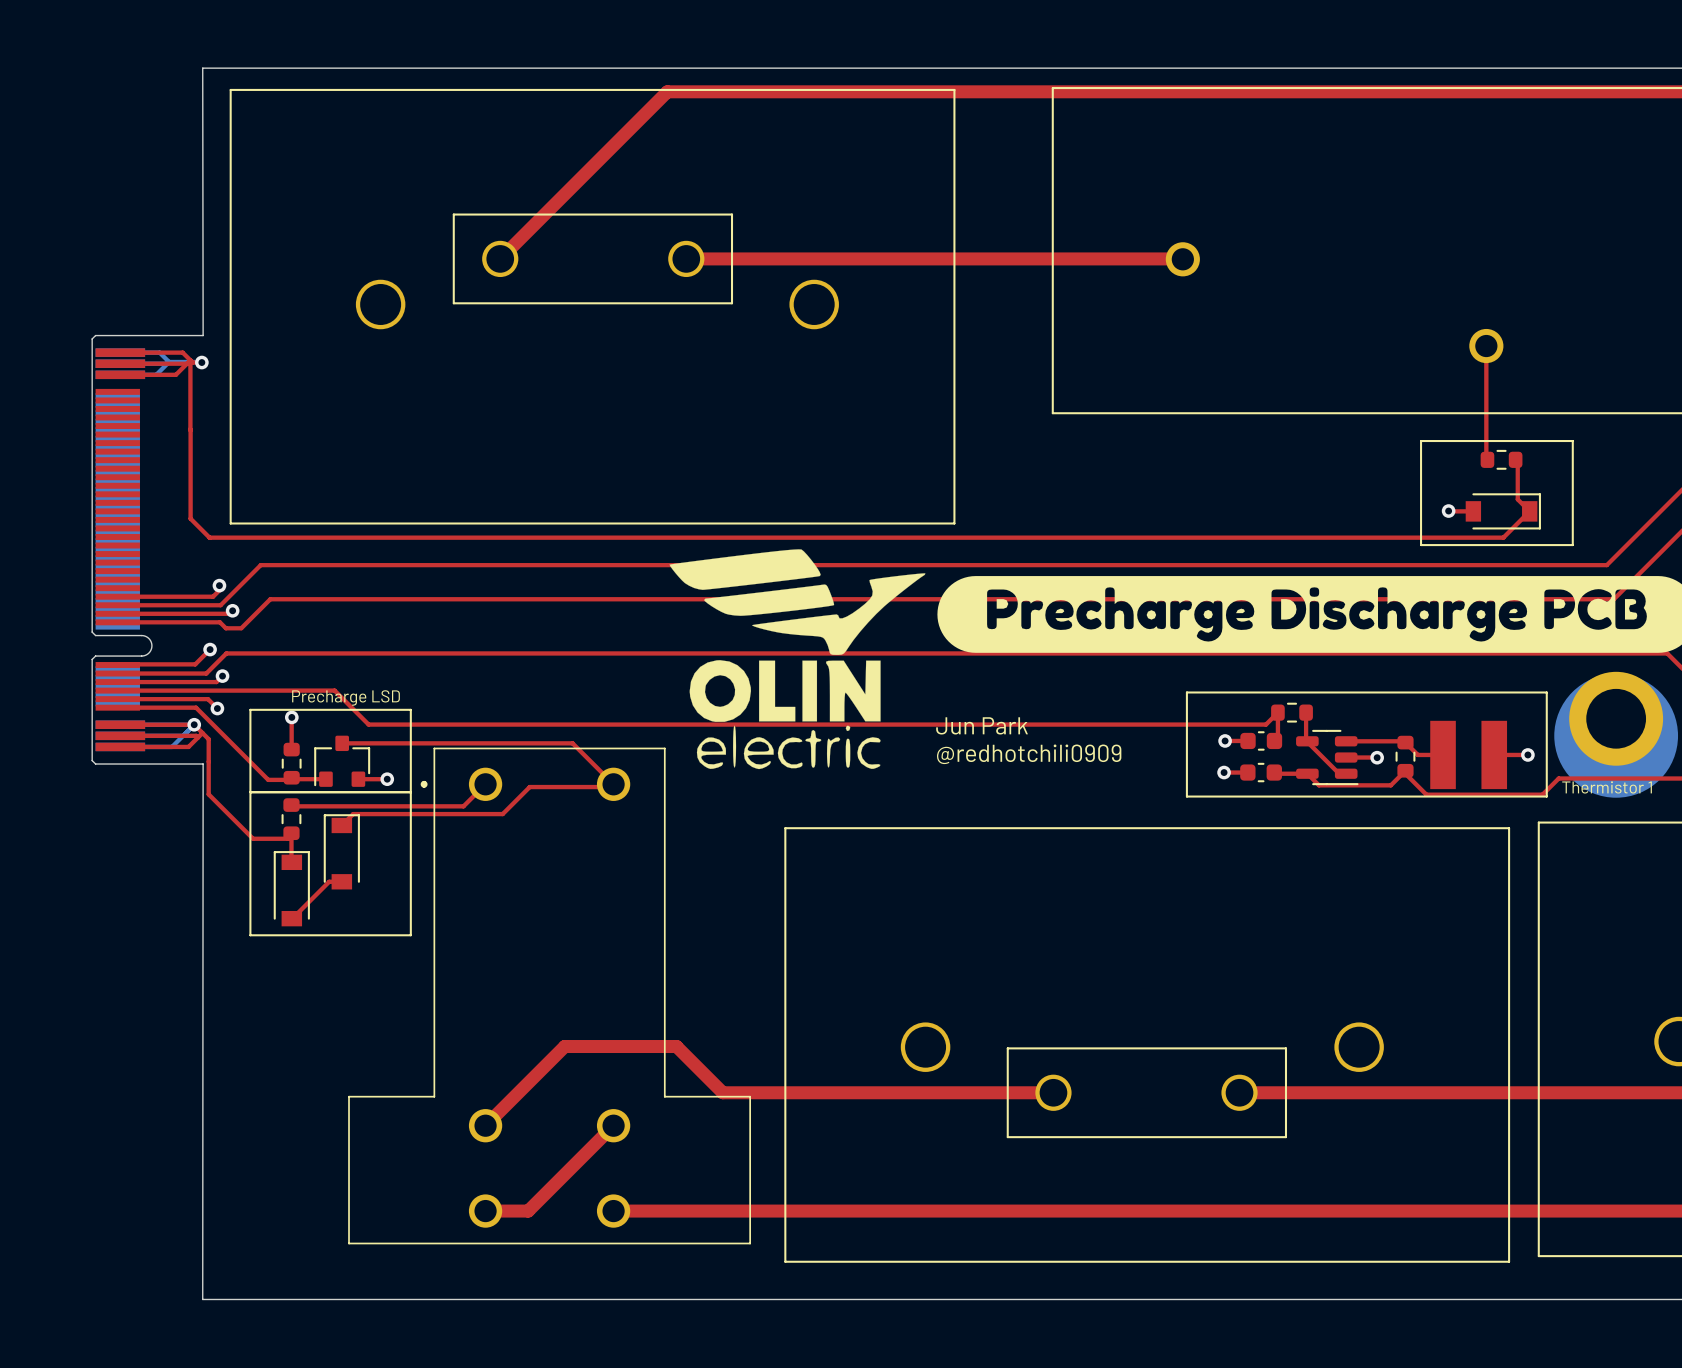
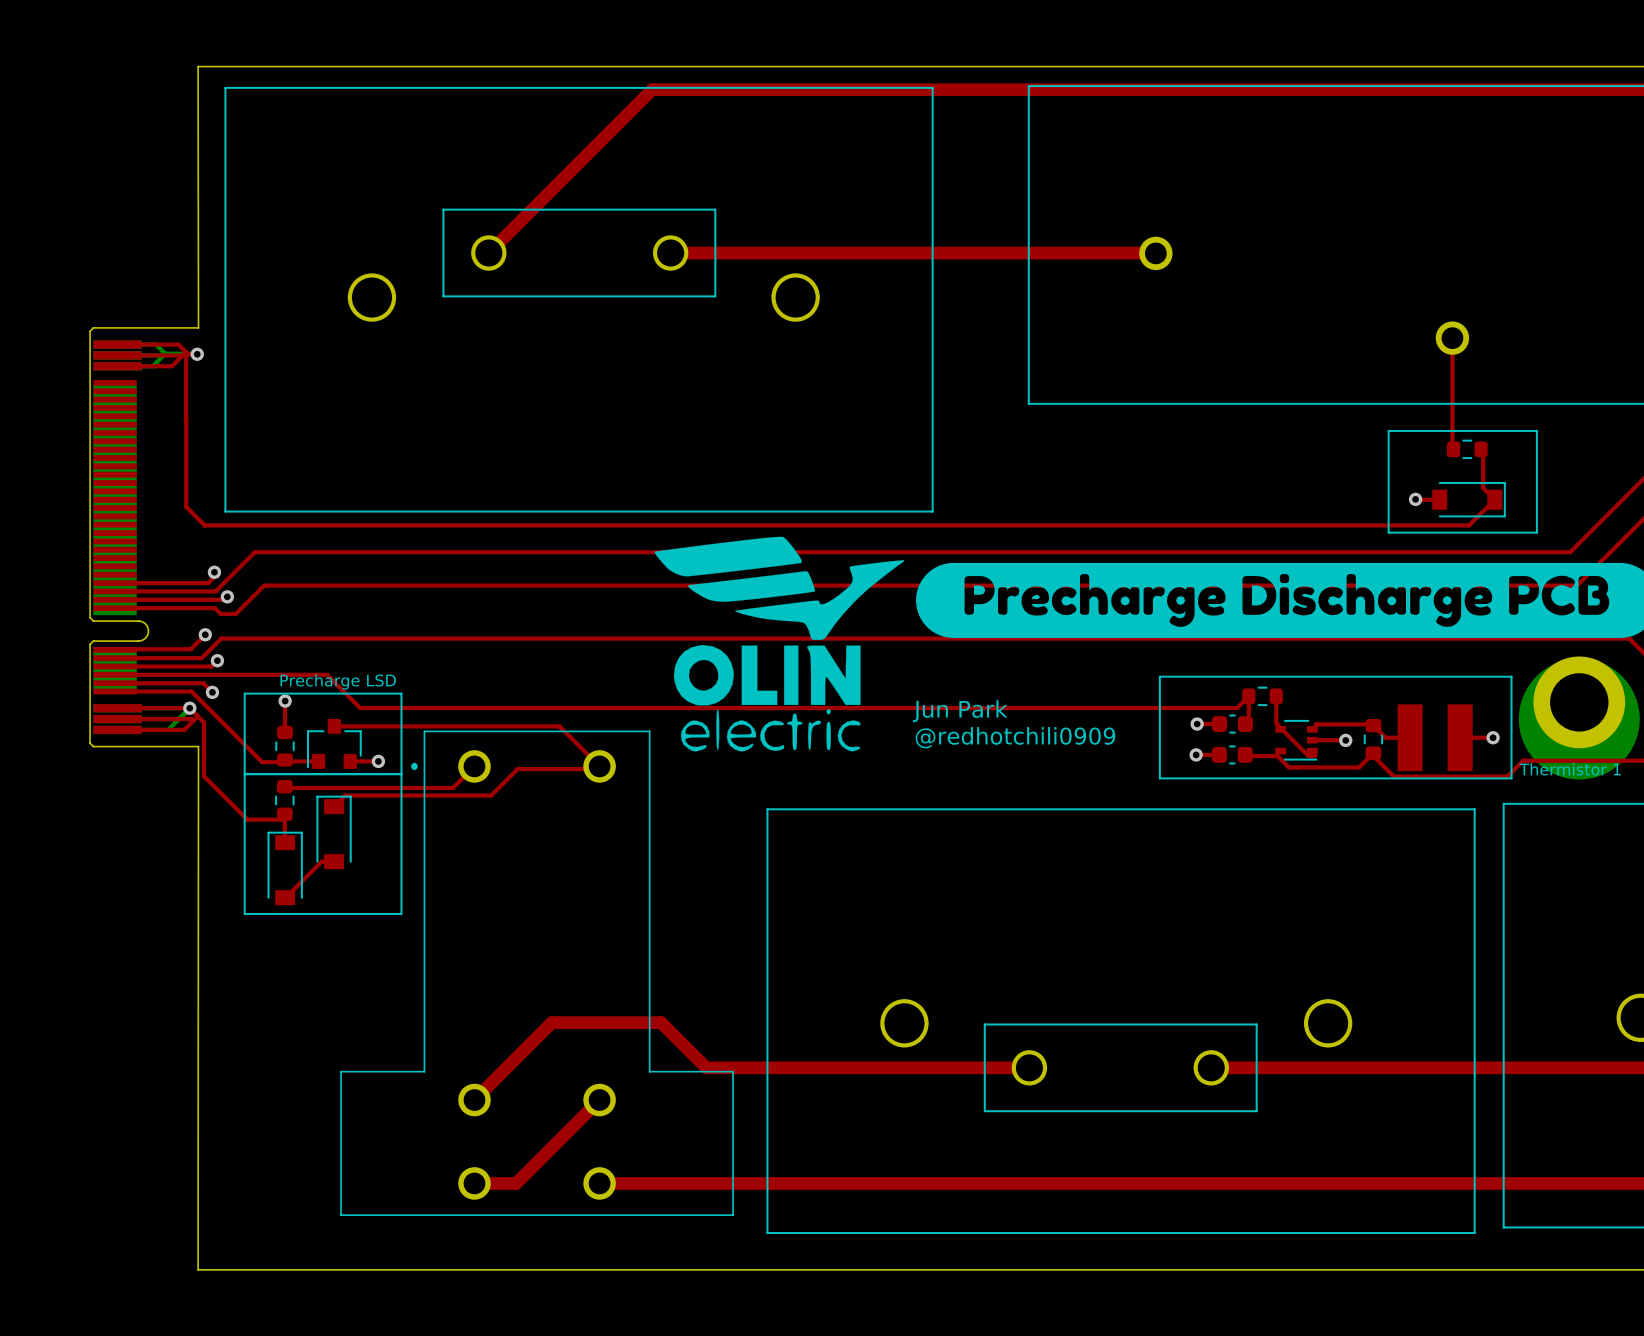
part footprint: [1296, 729, 1359, 786] -> [1275, 719, 1318, 761]

